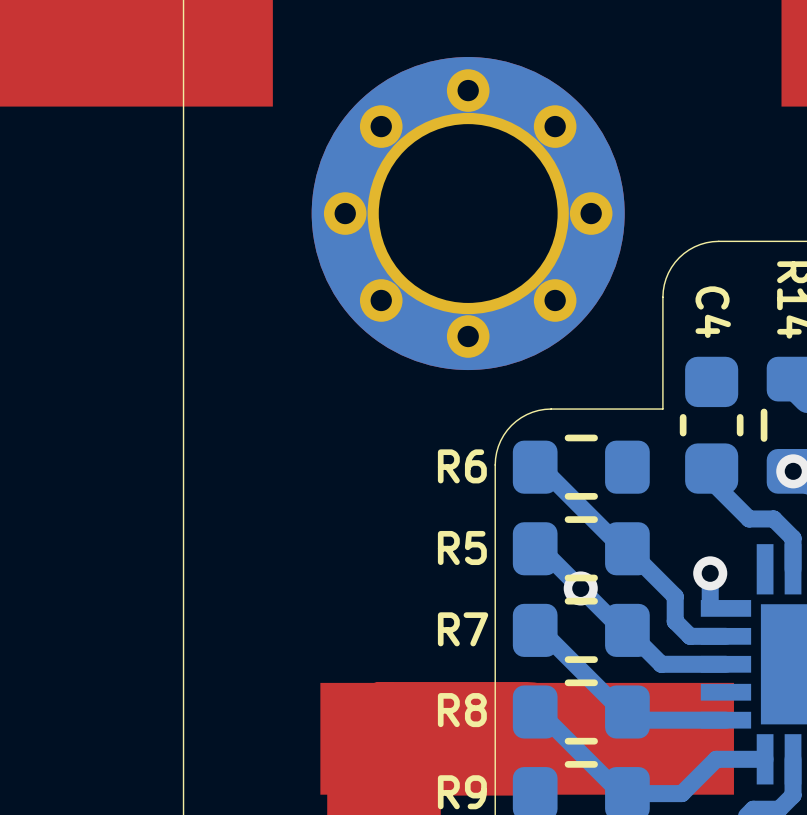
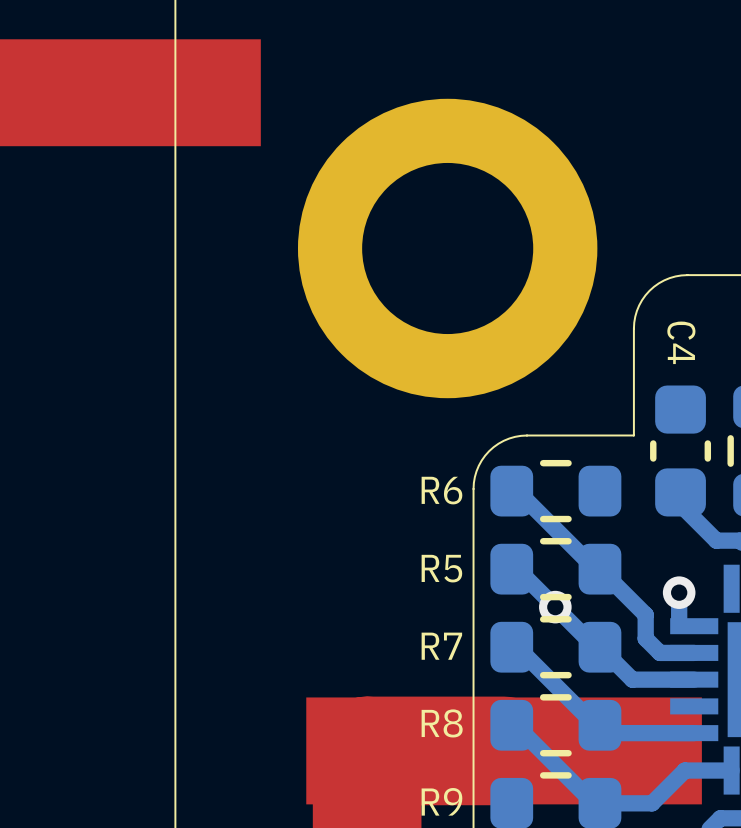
part footprint: [311, 57, 625, 371] -> [297, 98, 598, 399]

